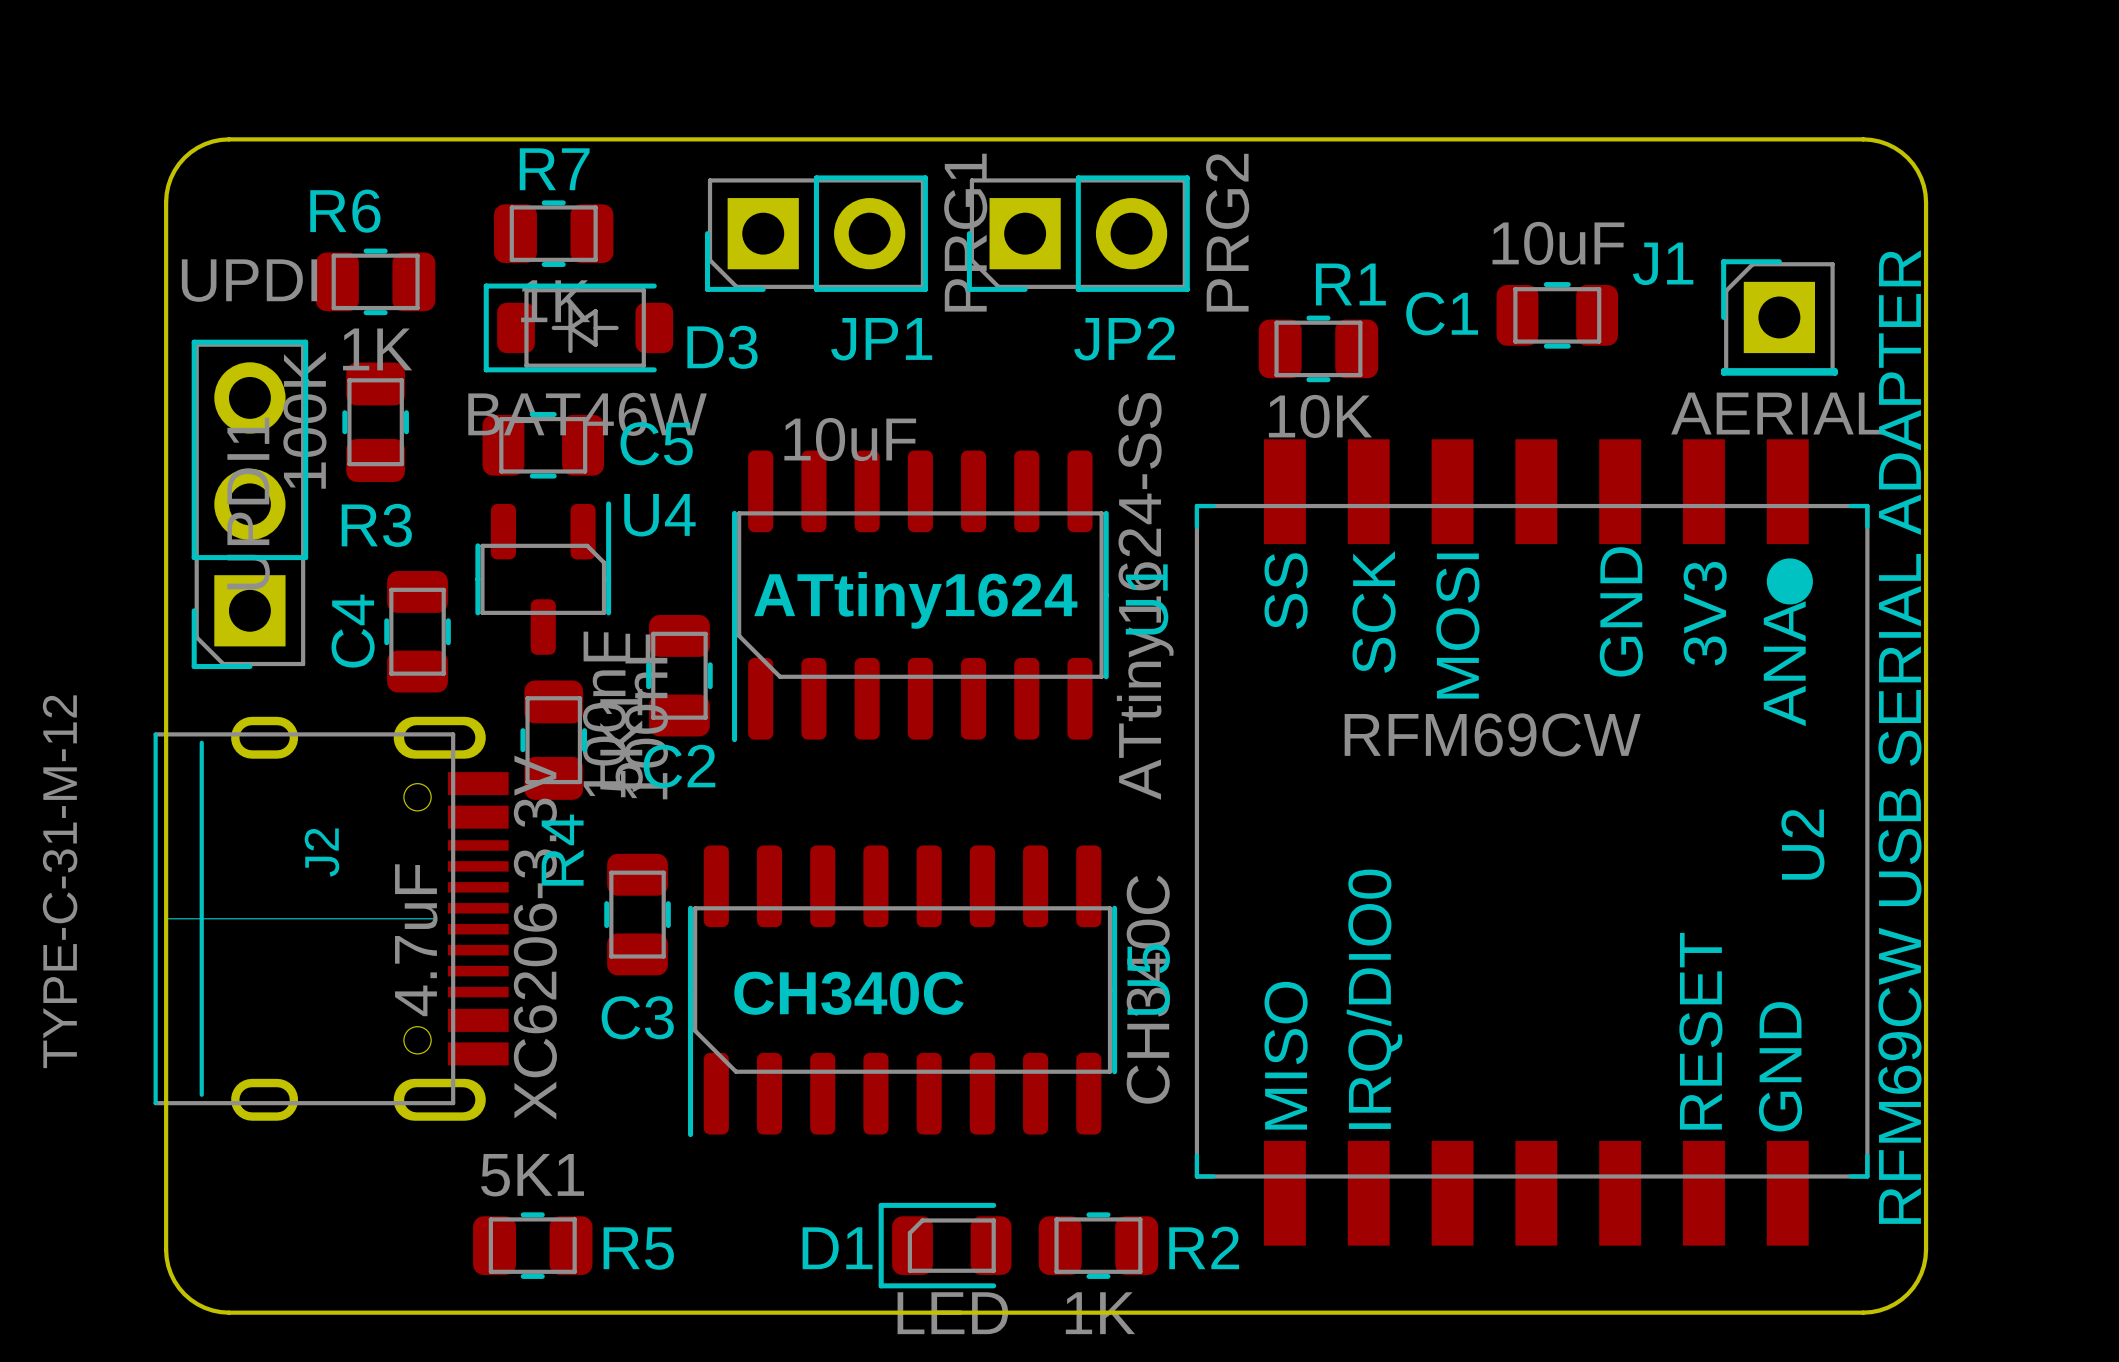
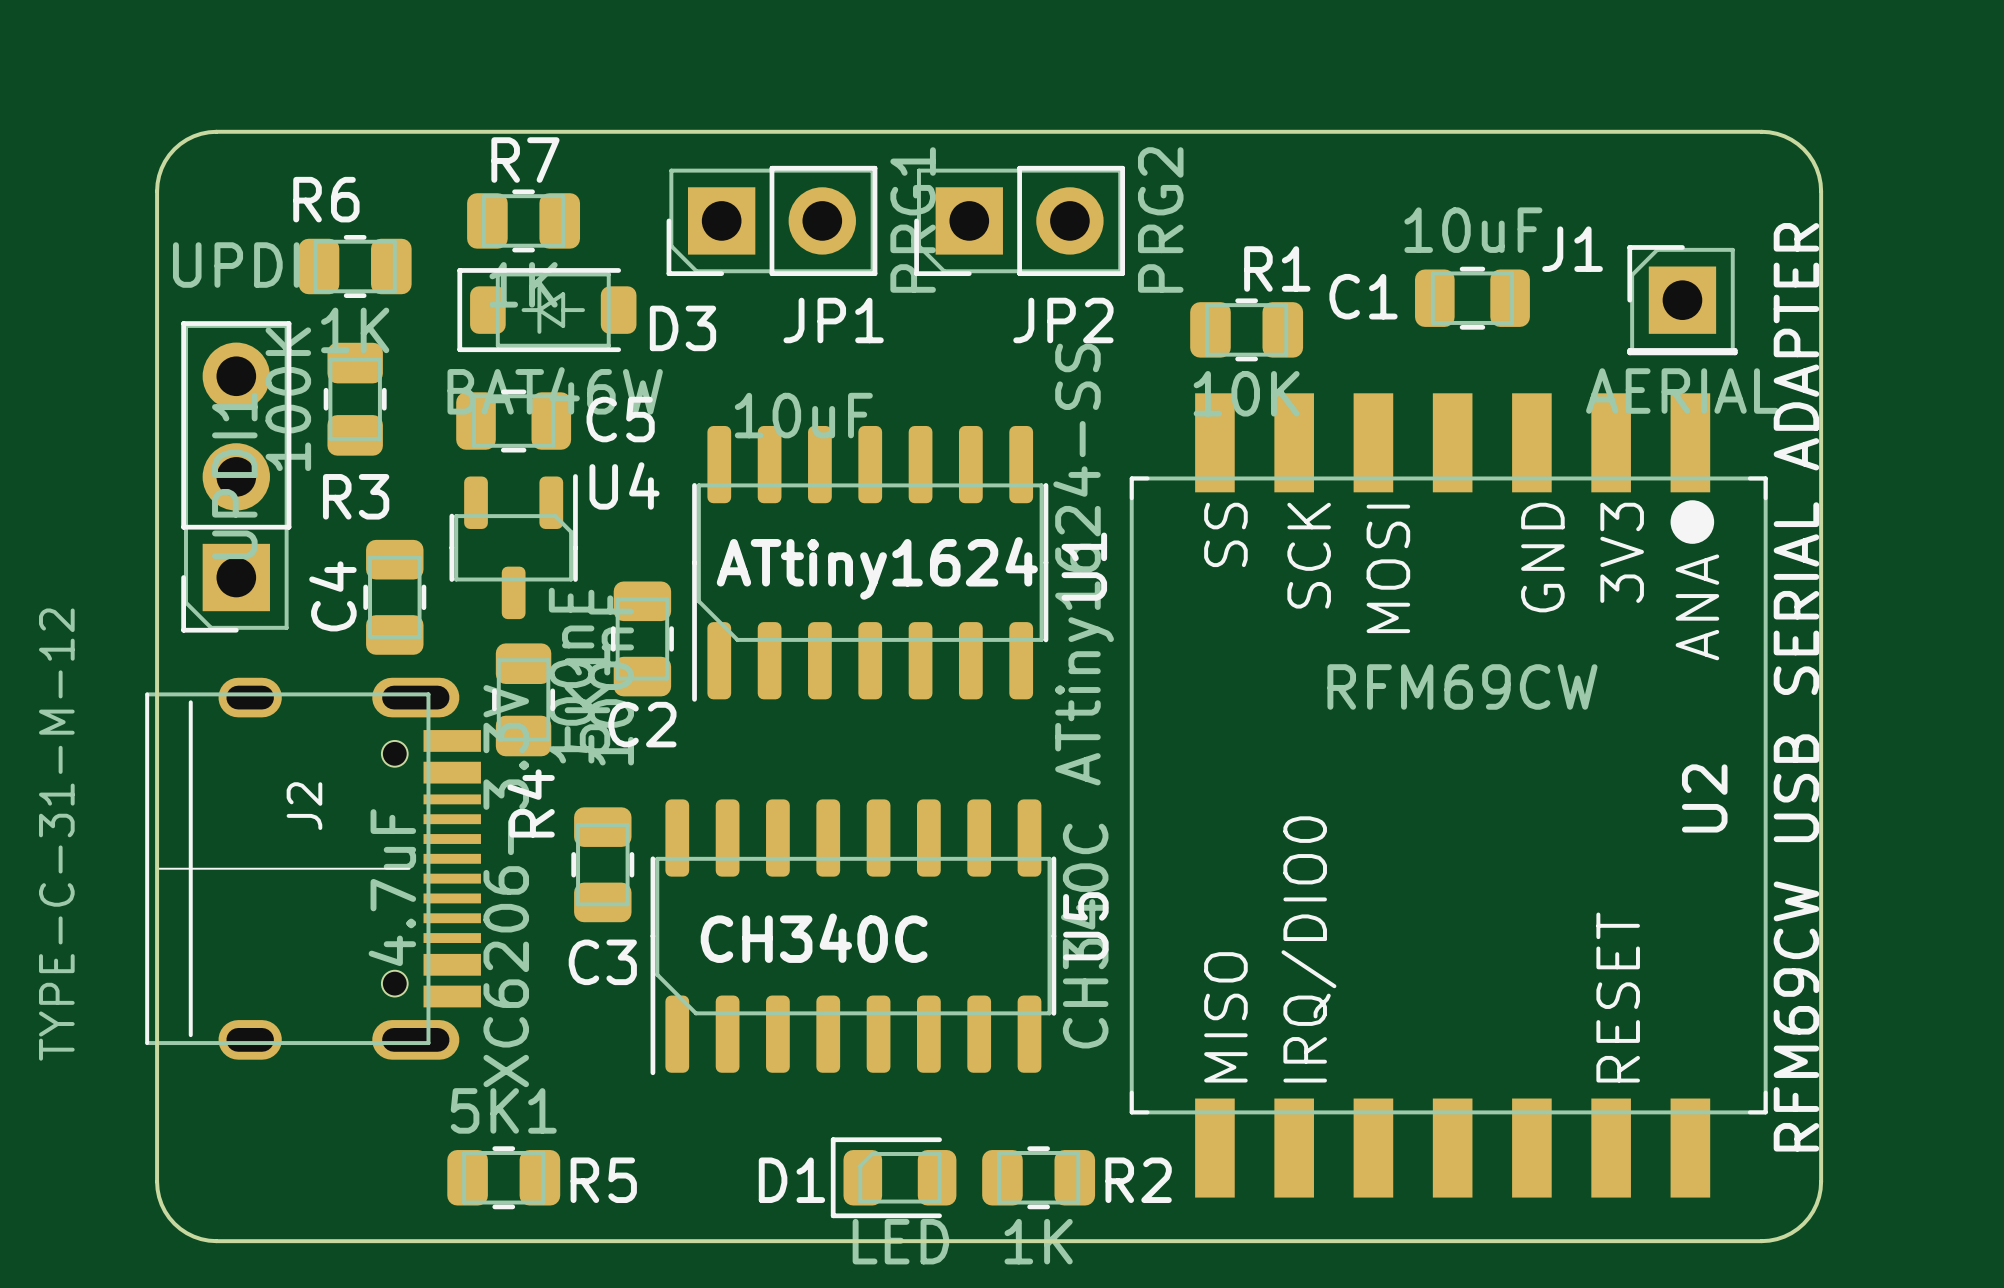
U2 footprint: [1194, 439, 1870, 1246] -> [1129, 393, 1768, 1198]

